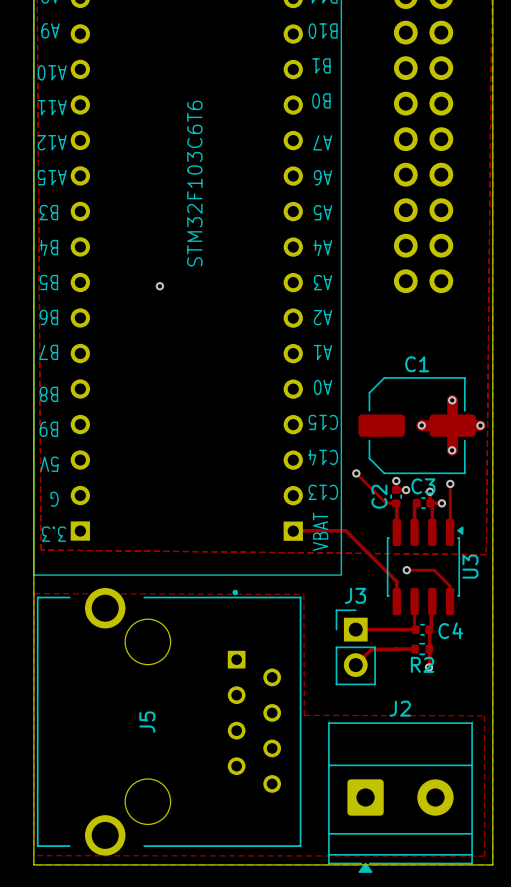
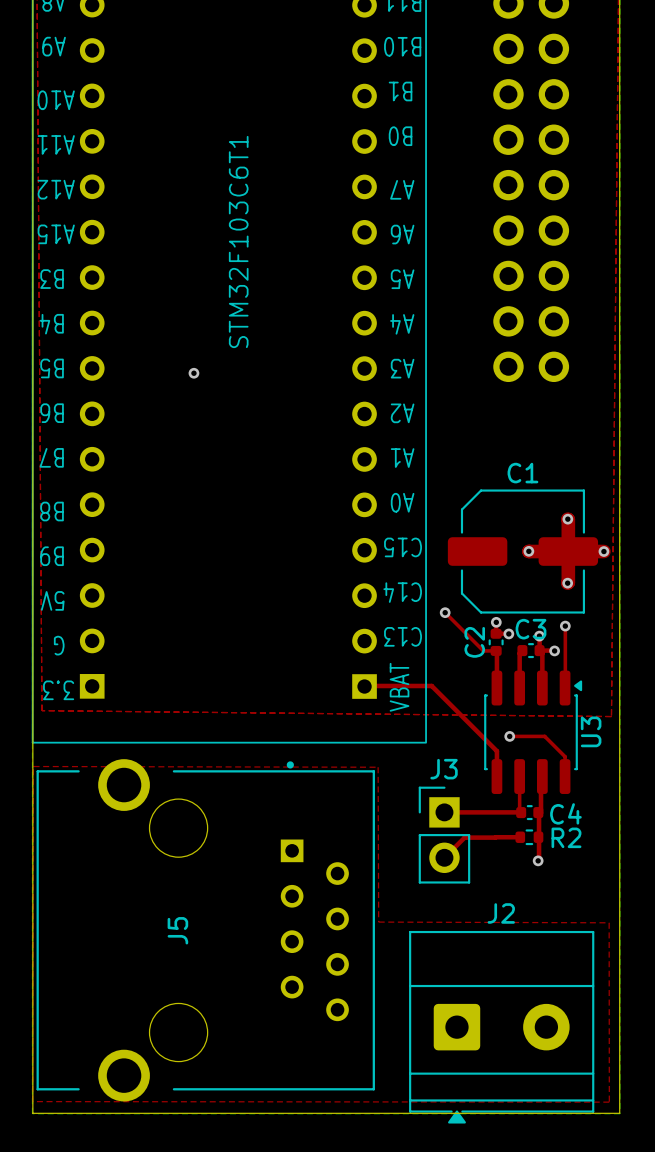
STM32F103C6T6 name: STM32F103C6T6 (194, 183) -> STM32F103C6T1 (238, 242)
R2 name position: R2 (422, 664) -> R2 (566, 837)

